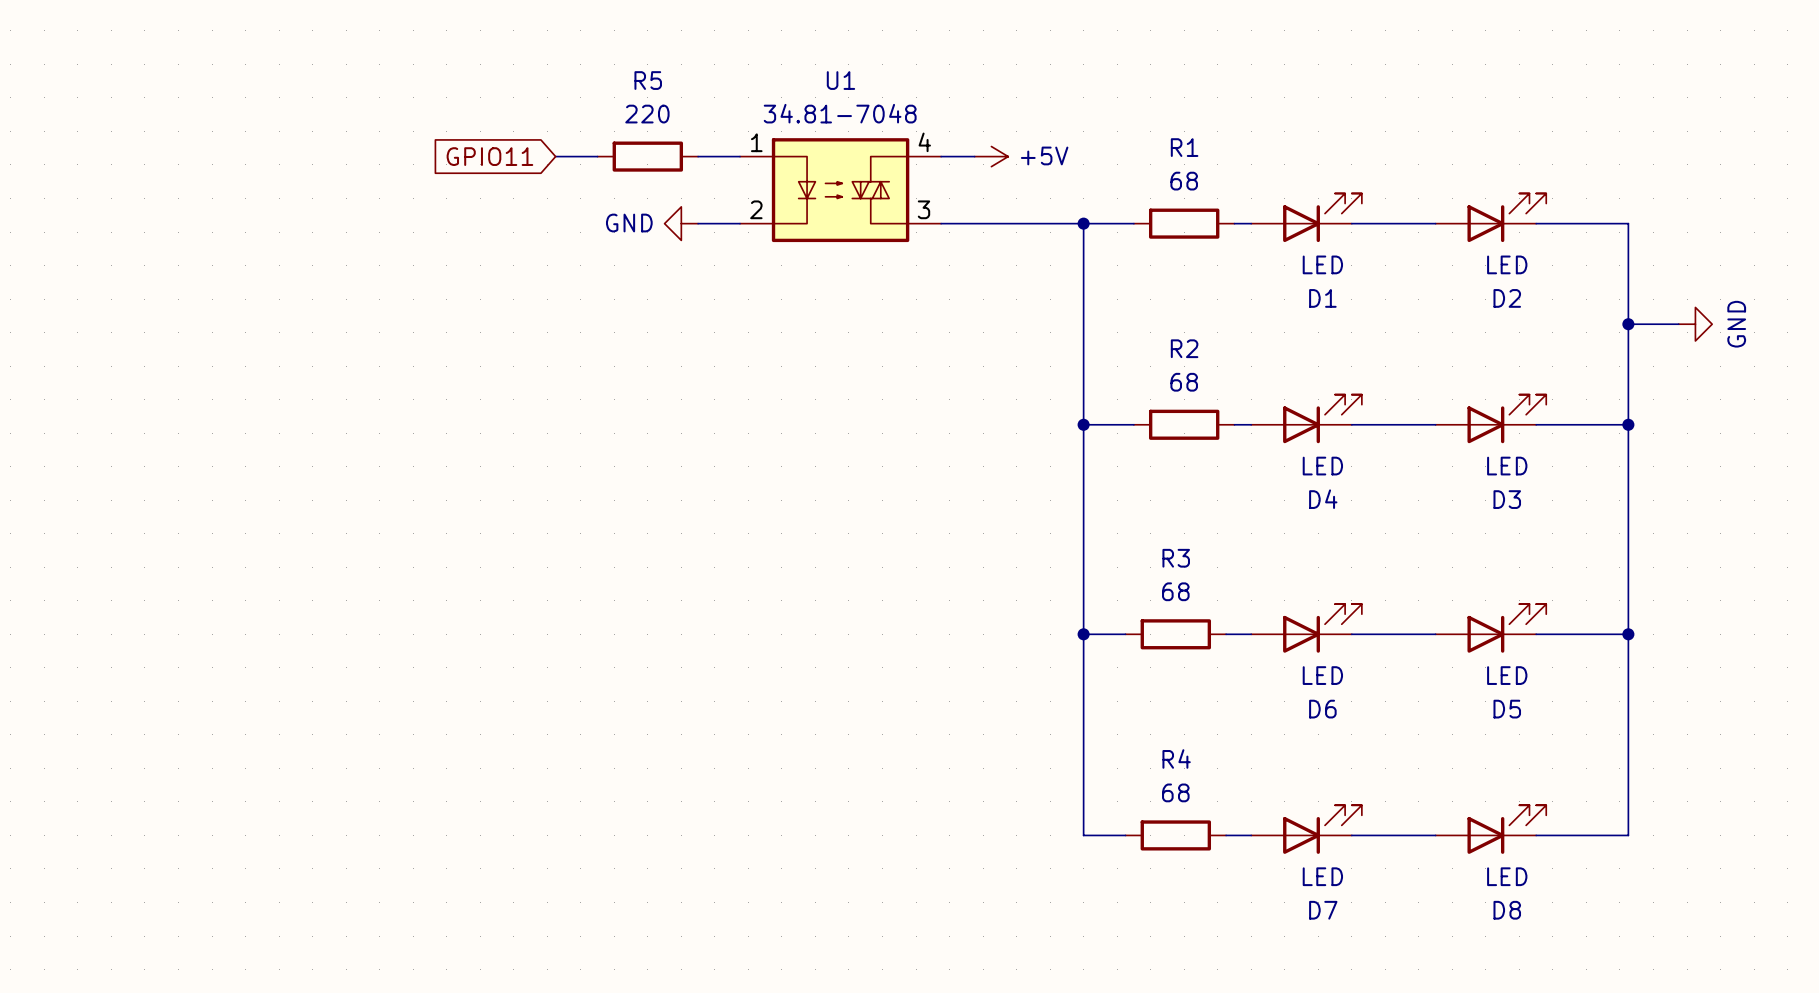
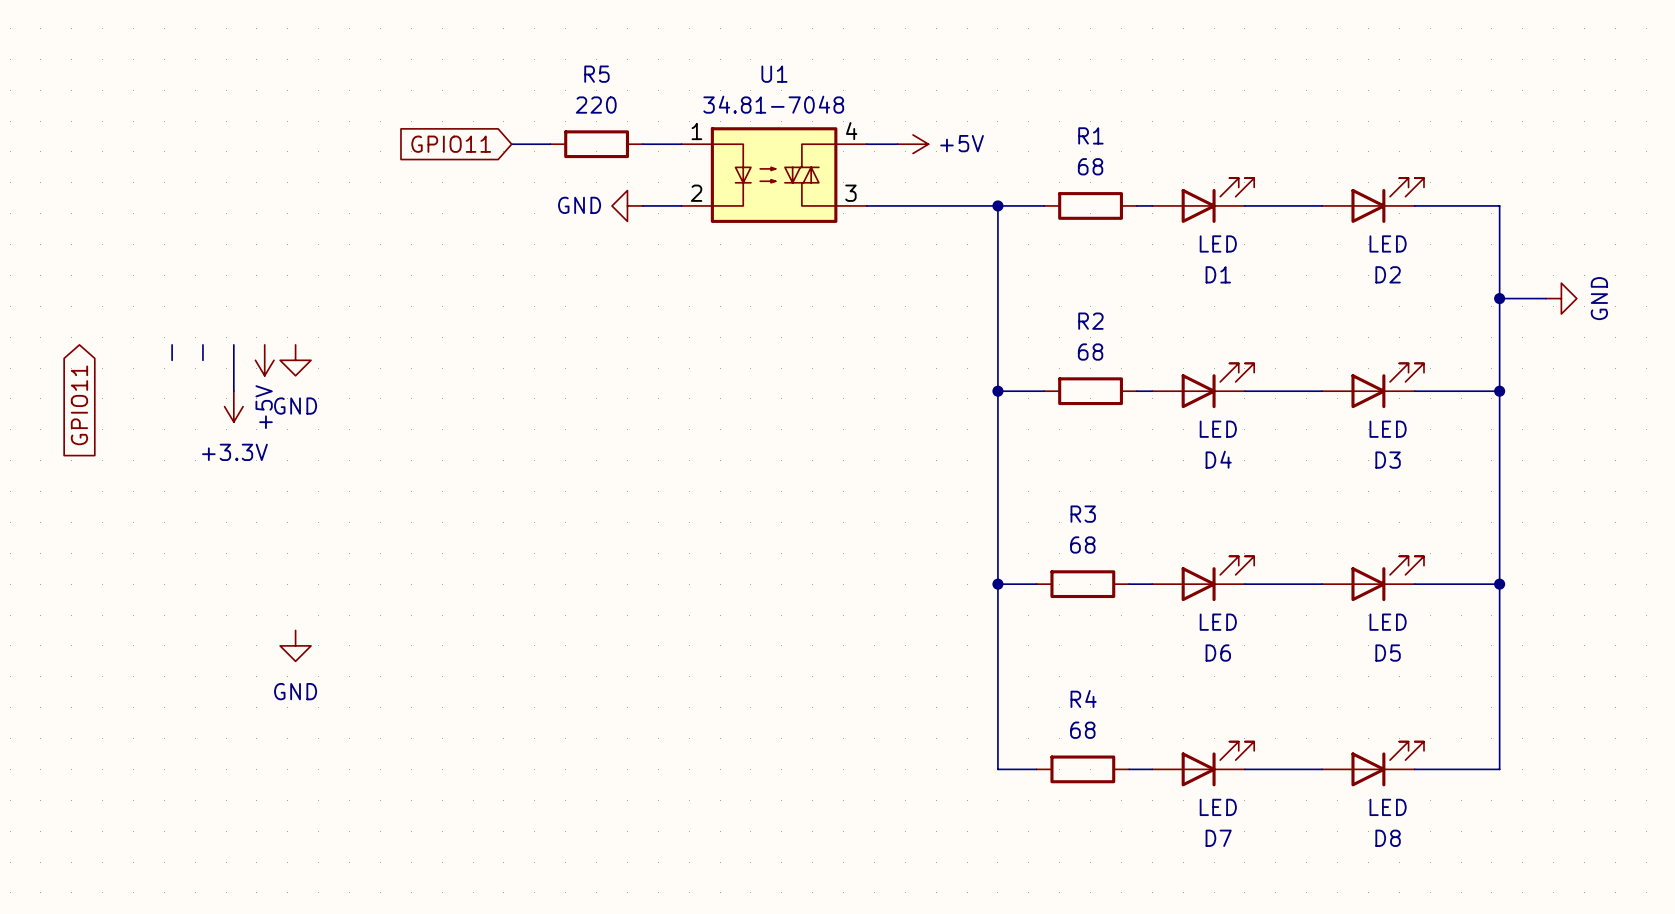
wire: none -> (172, 344) (172, 360)
wire: none -> (202, 344) (202, 360)
wire: none -> (233, 344) (233, 391)
power symbol: none -> +5V (264, 360)
power symbol: none -> GND (295, 360)
global label: none -> GPIO11 (79, 405)
power symbol: none -> +3.3V (233, 406)
power symbol: none -> GND (295, 645)

